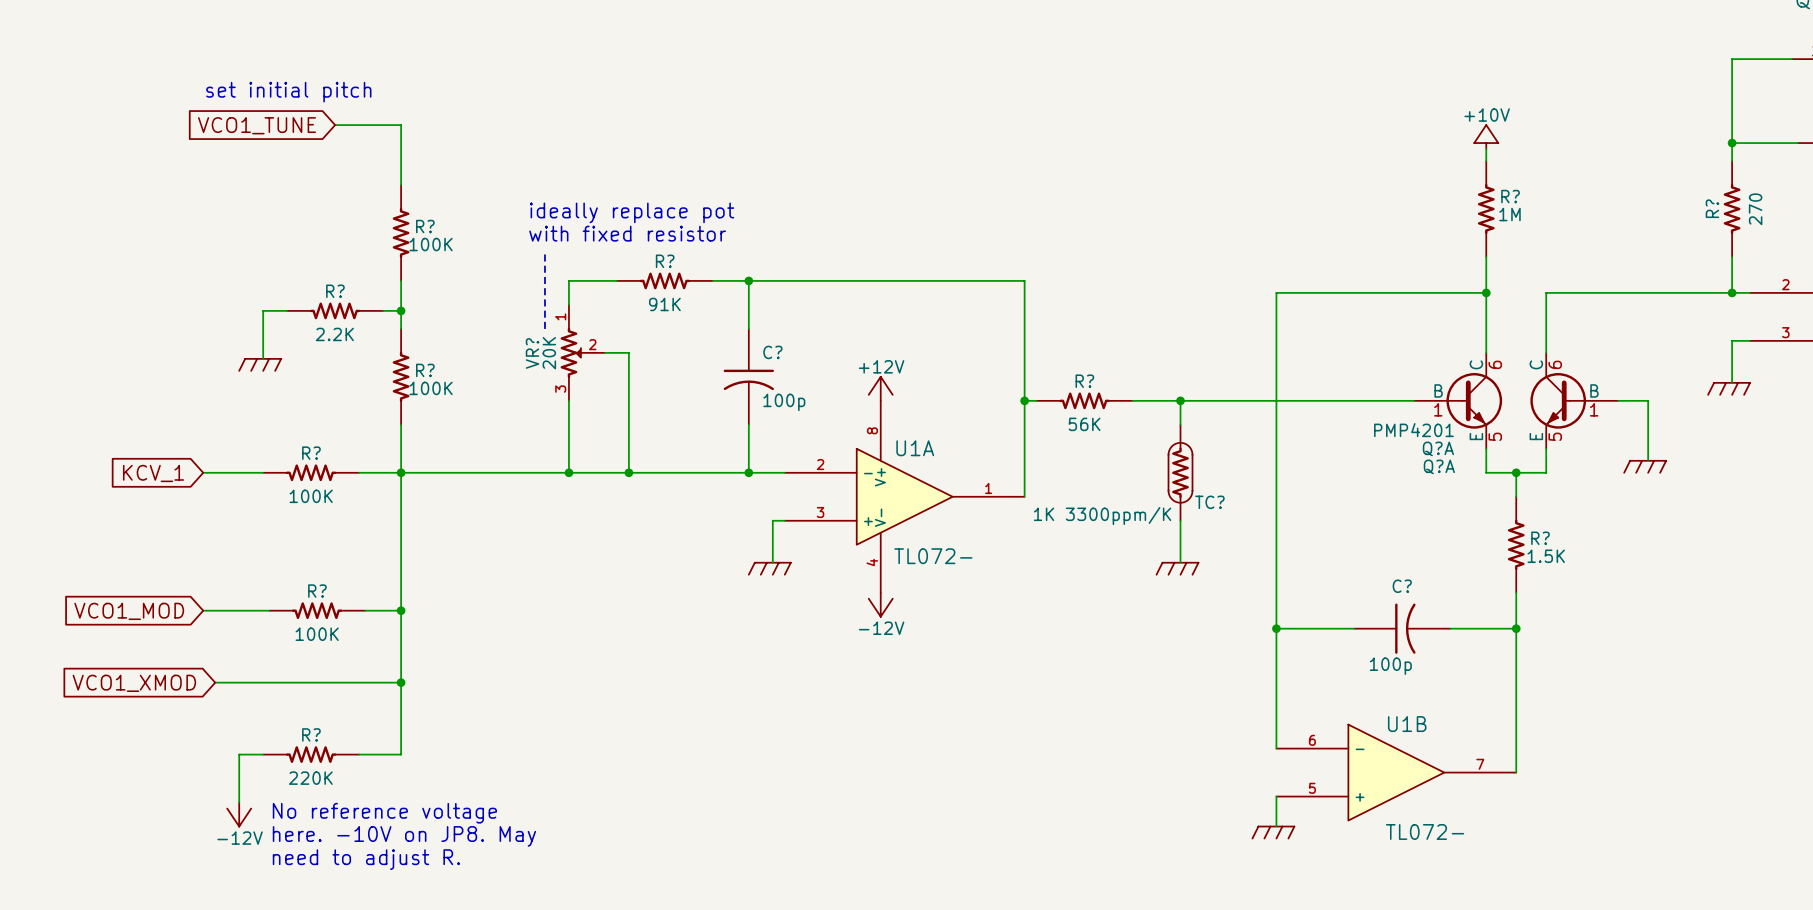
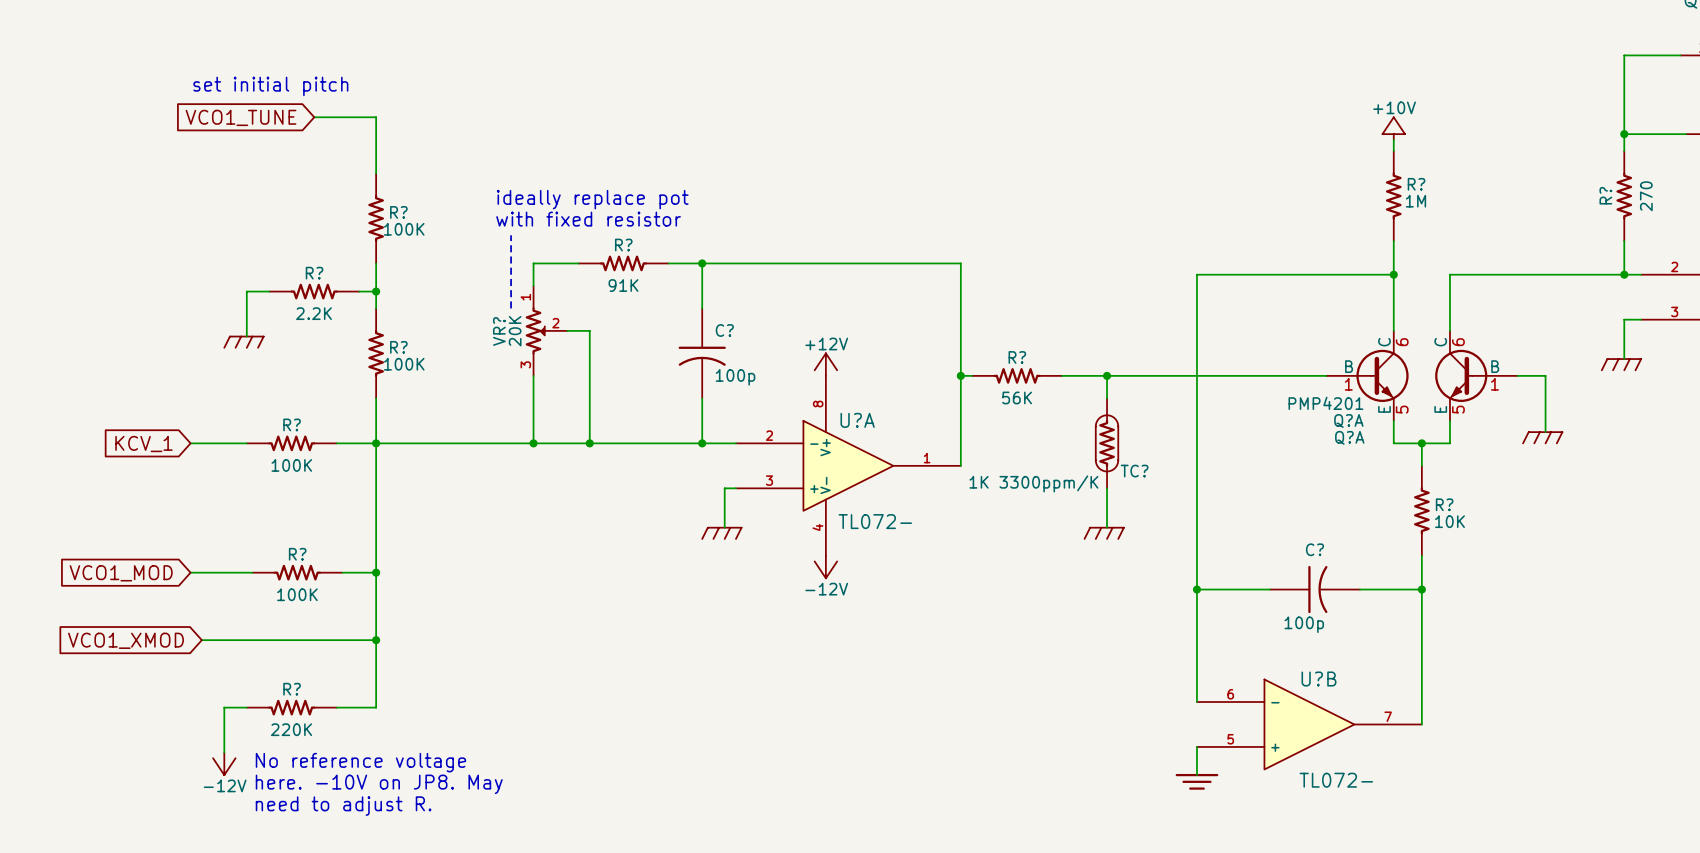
U1A name: U1A (915, 448) -> U?A (857, 420)
R? value: 1.5K (1546, 556) -> 10K (1449, 521)
U1B name: U1B (1407, 724) -> U?B (1318, 679)
power symbol shape: [1252, 826, 1295, 839] -> [1175, 773, 1219, 790]

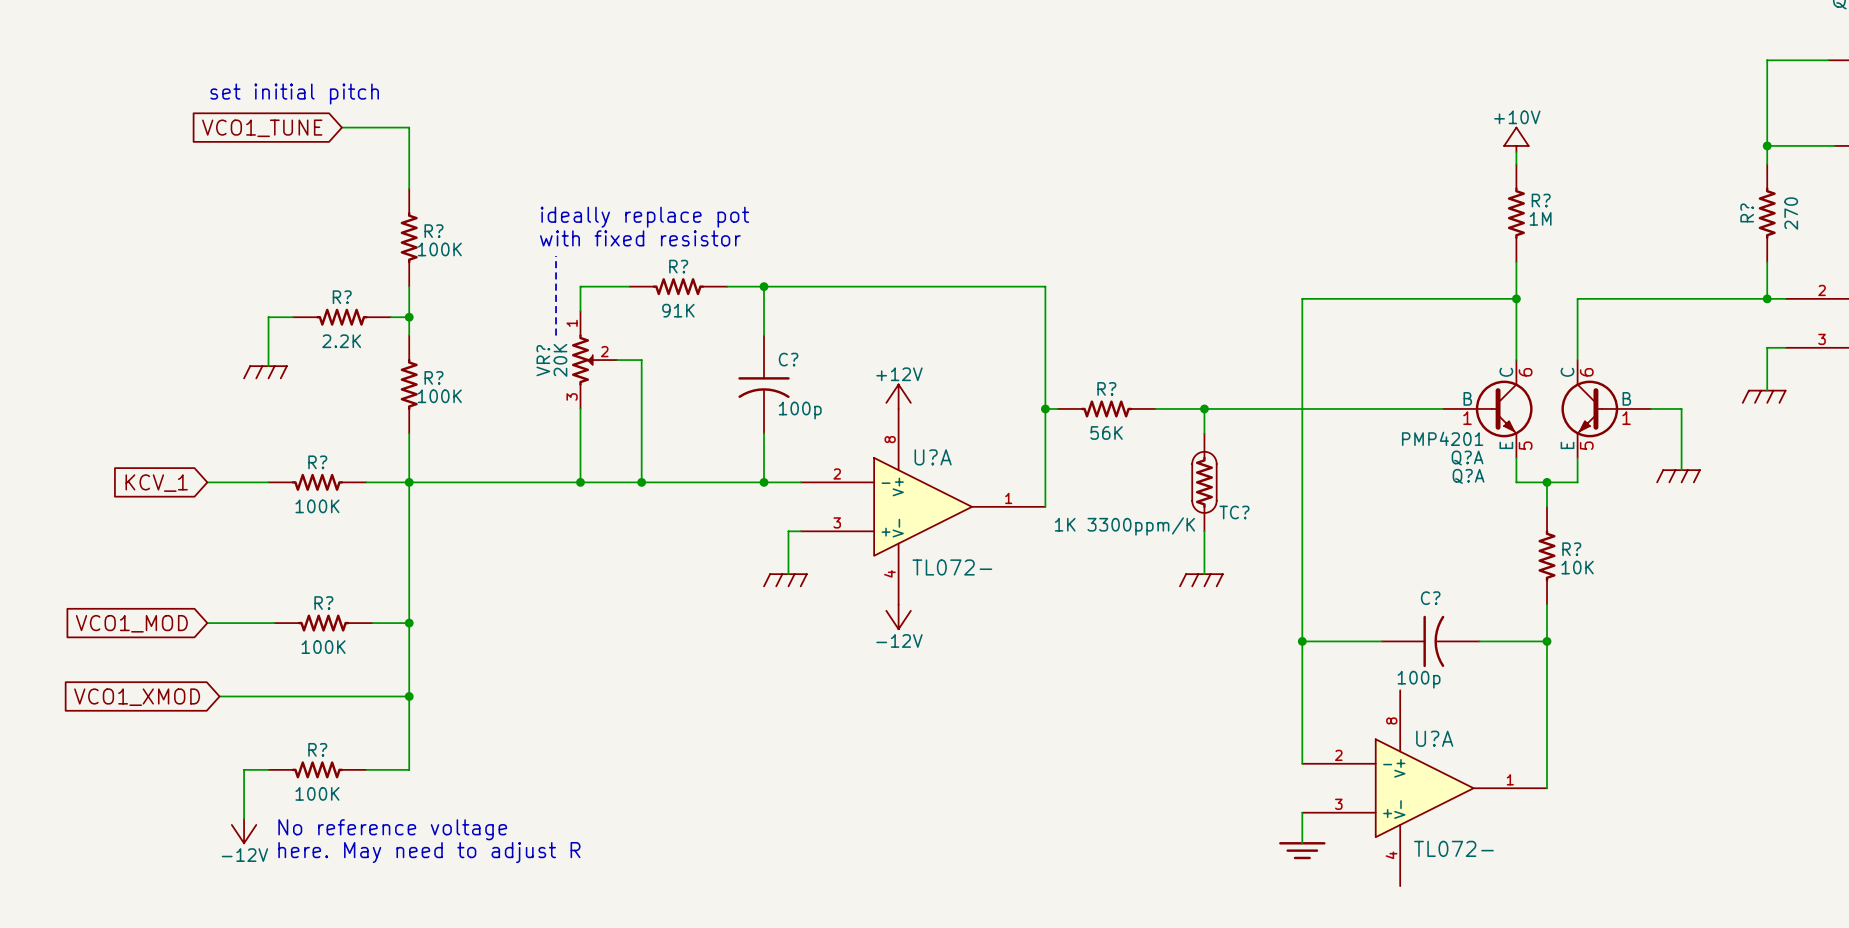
U?B: TL072- (1309, 724) -> none
U?A: none -> TL072- (1424, 788)
R? value: 220K (291, 729) -> 100K (317, 793)
text: here. -10V on JP8. May (379, 784) -> here. May need to adjust R (429, 852)
text: need to adjust R. (343, 806) -> none

